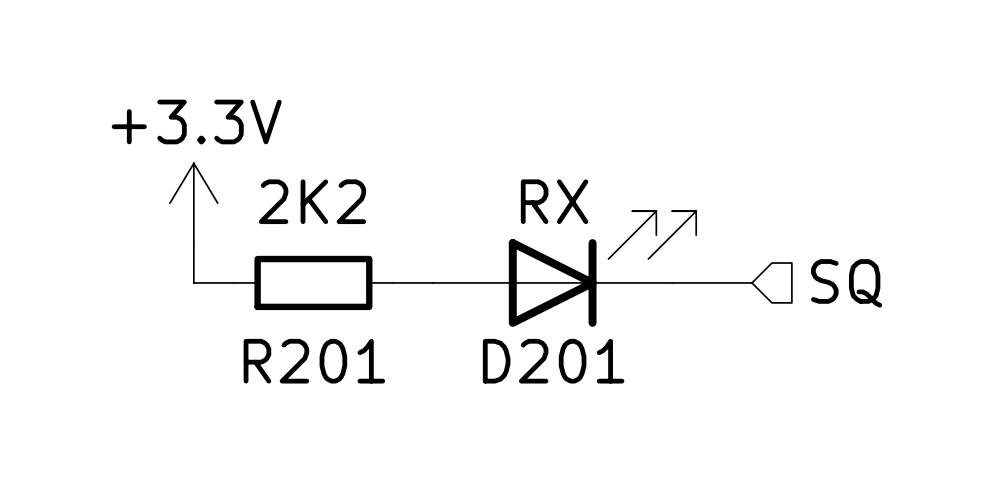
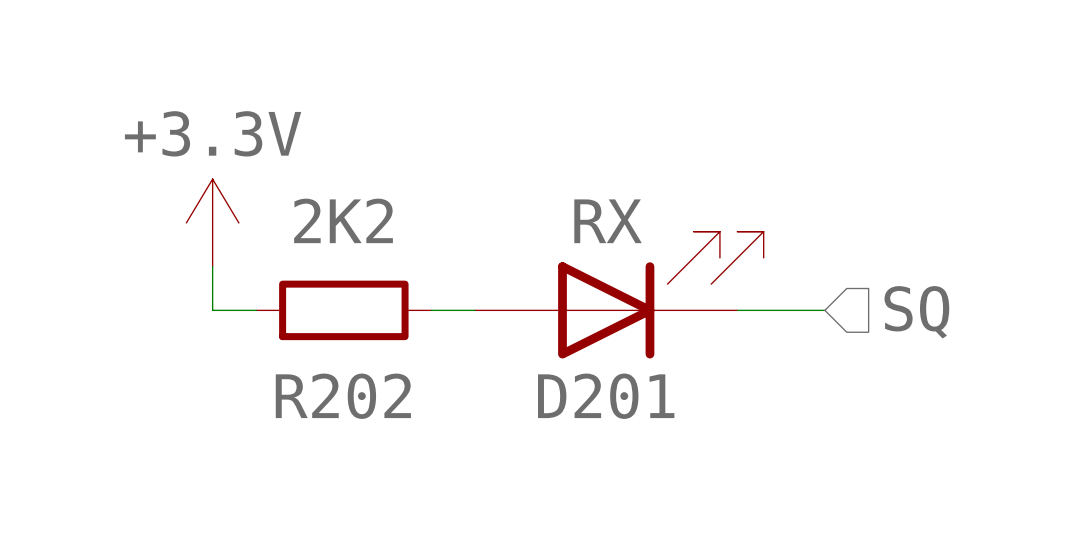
R201 name: R201 (314, 361) -> R202 (343, 396)

